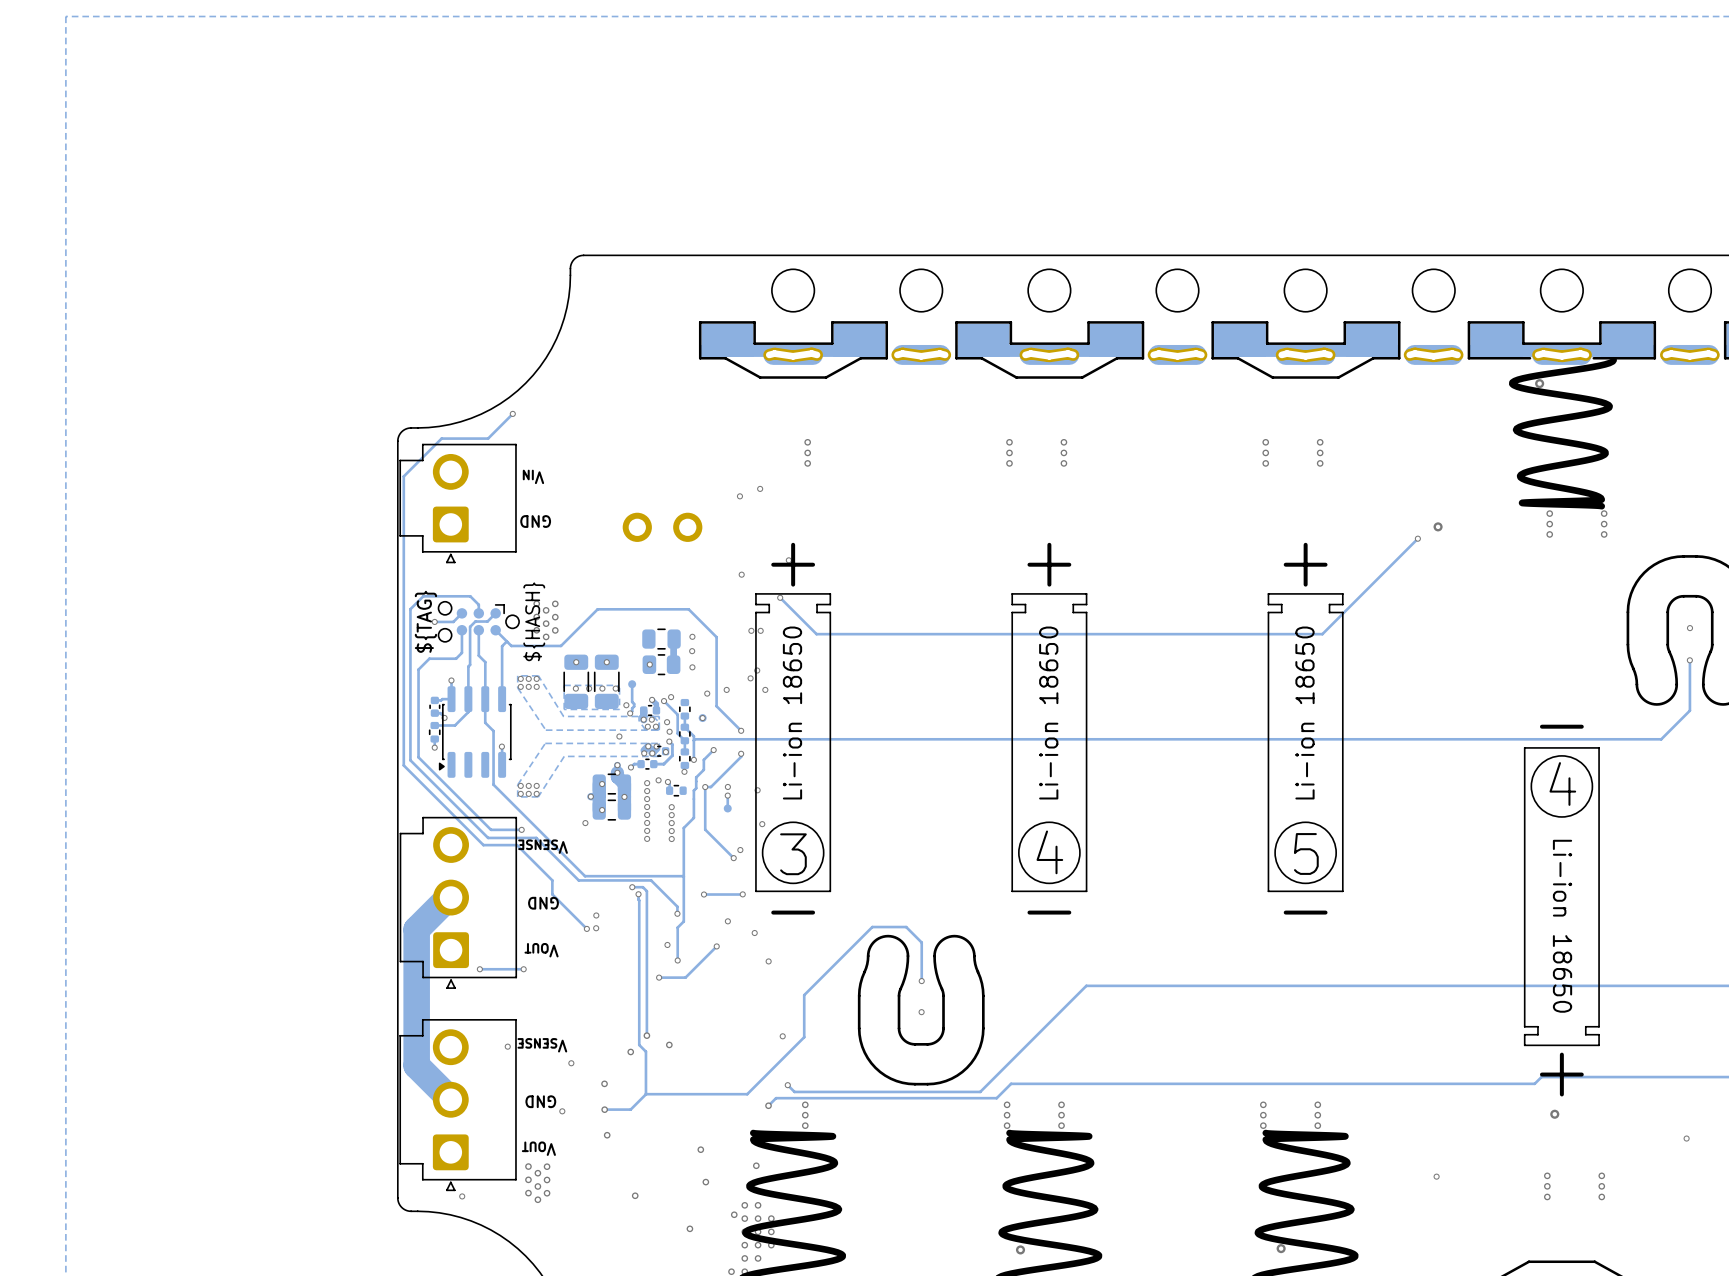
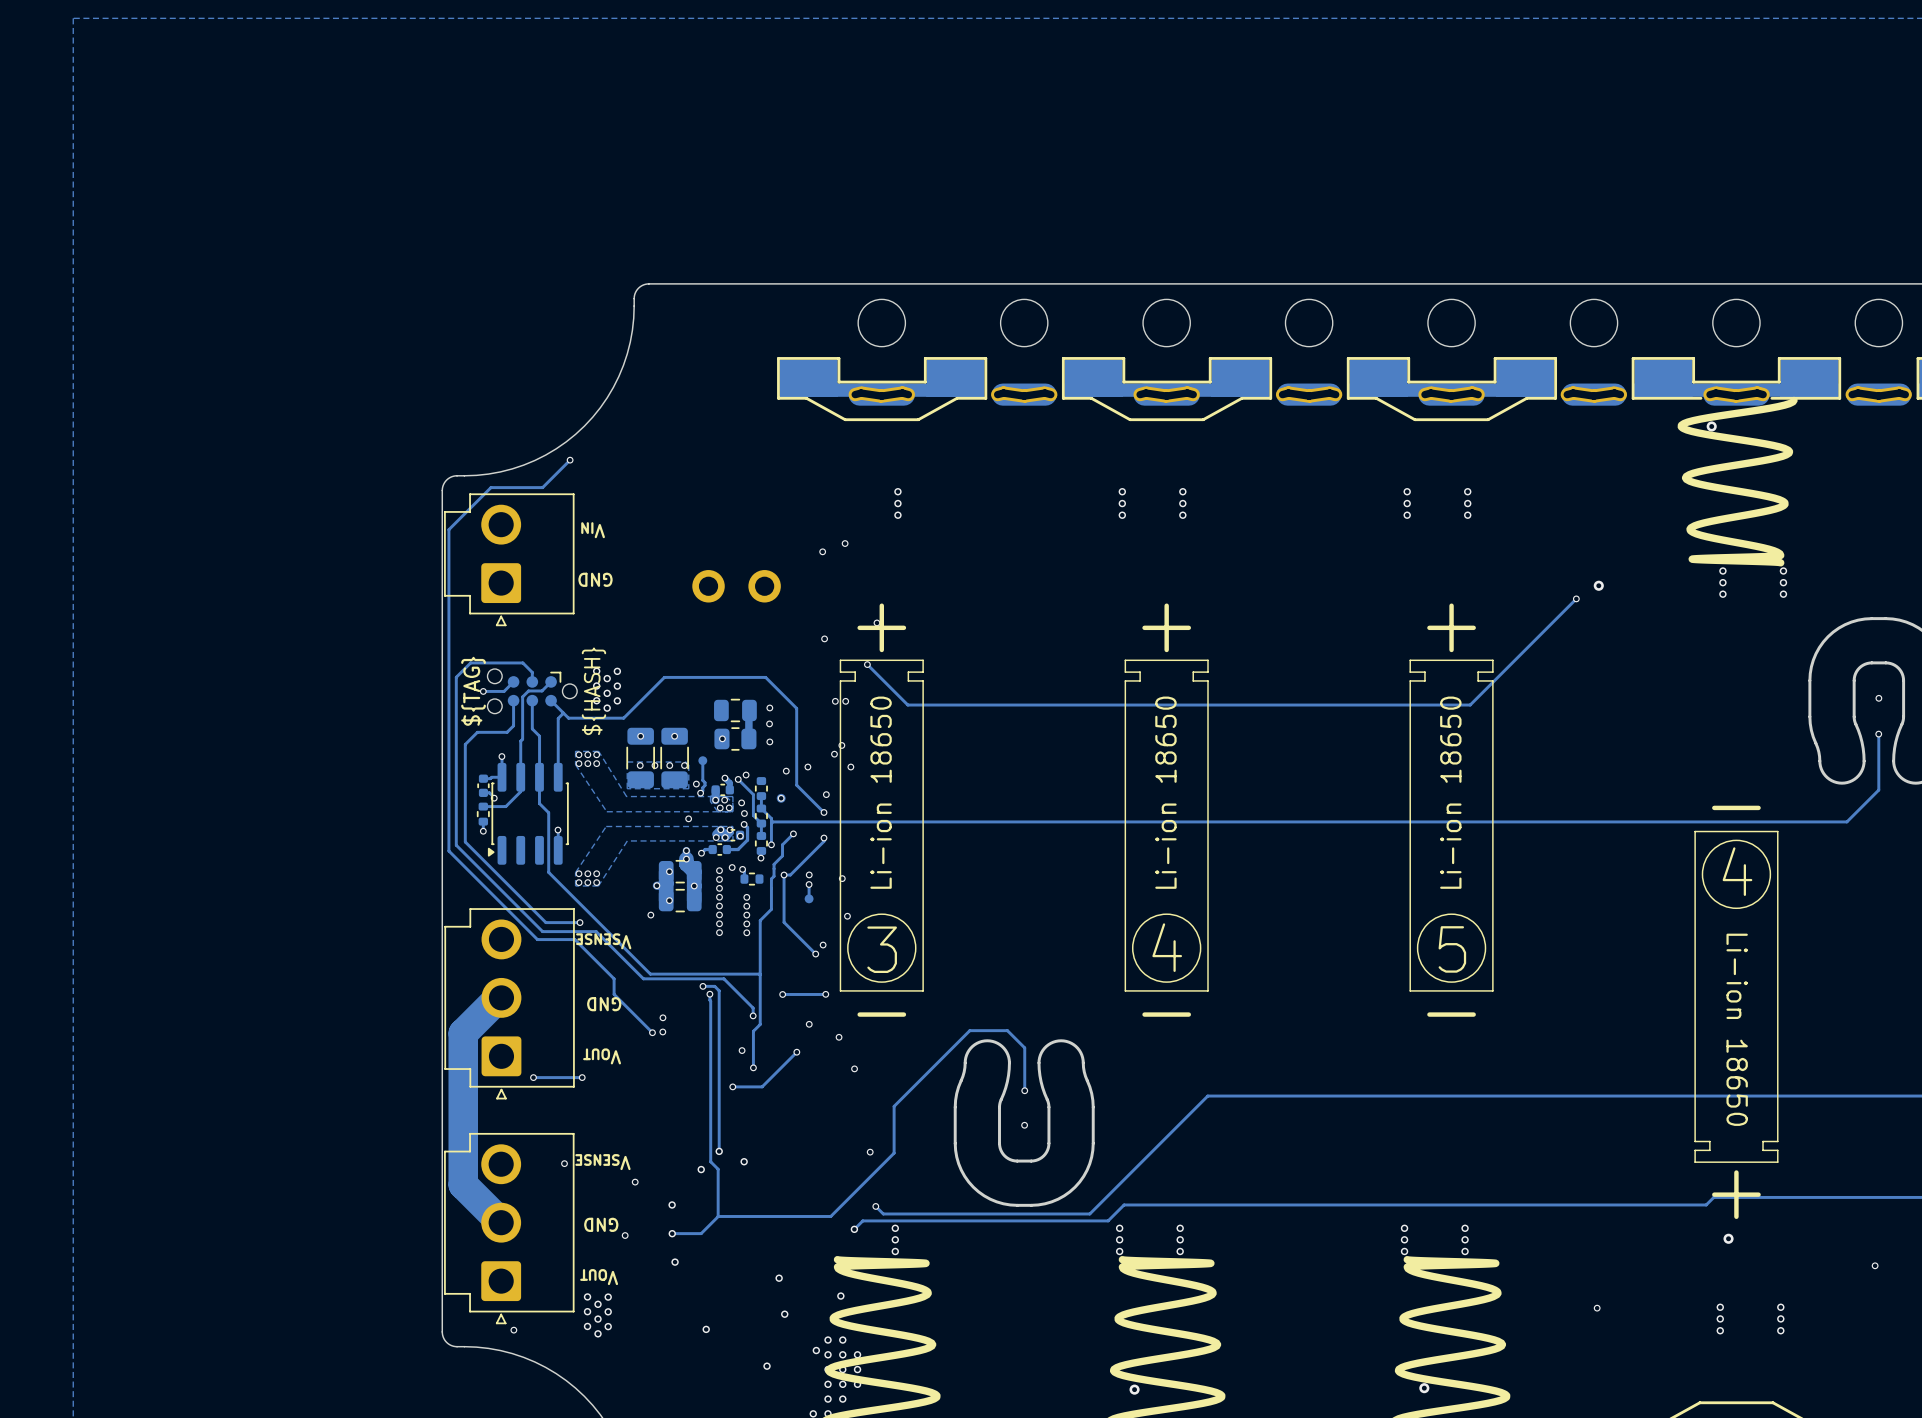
via: none -> (826, 794)

